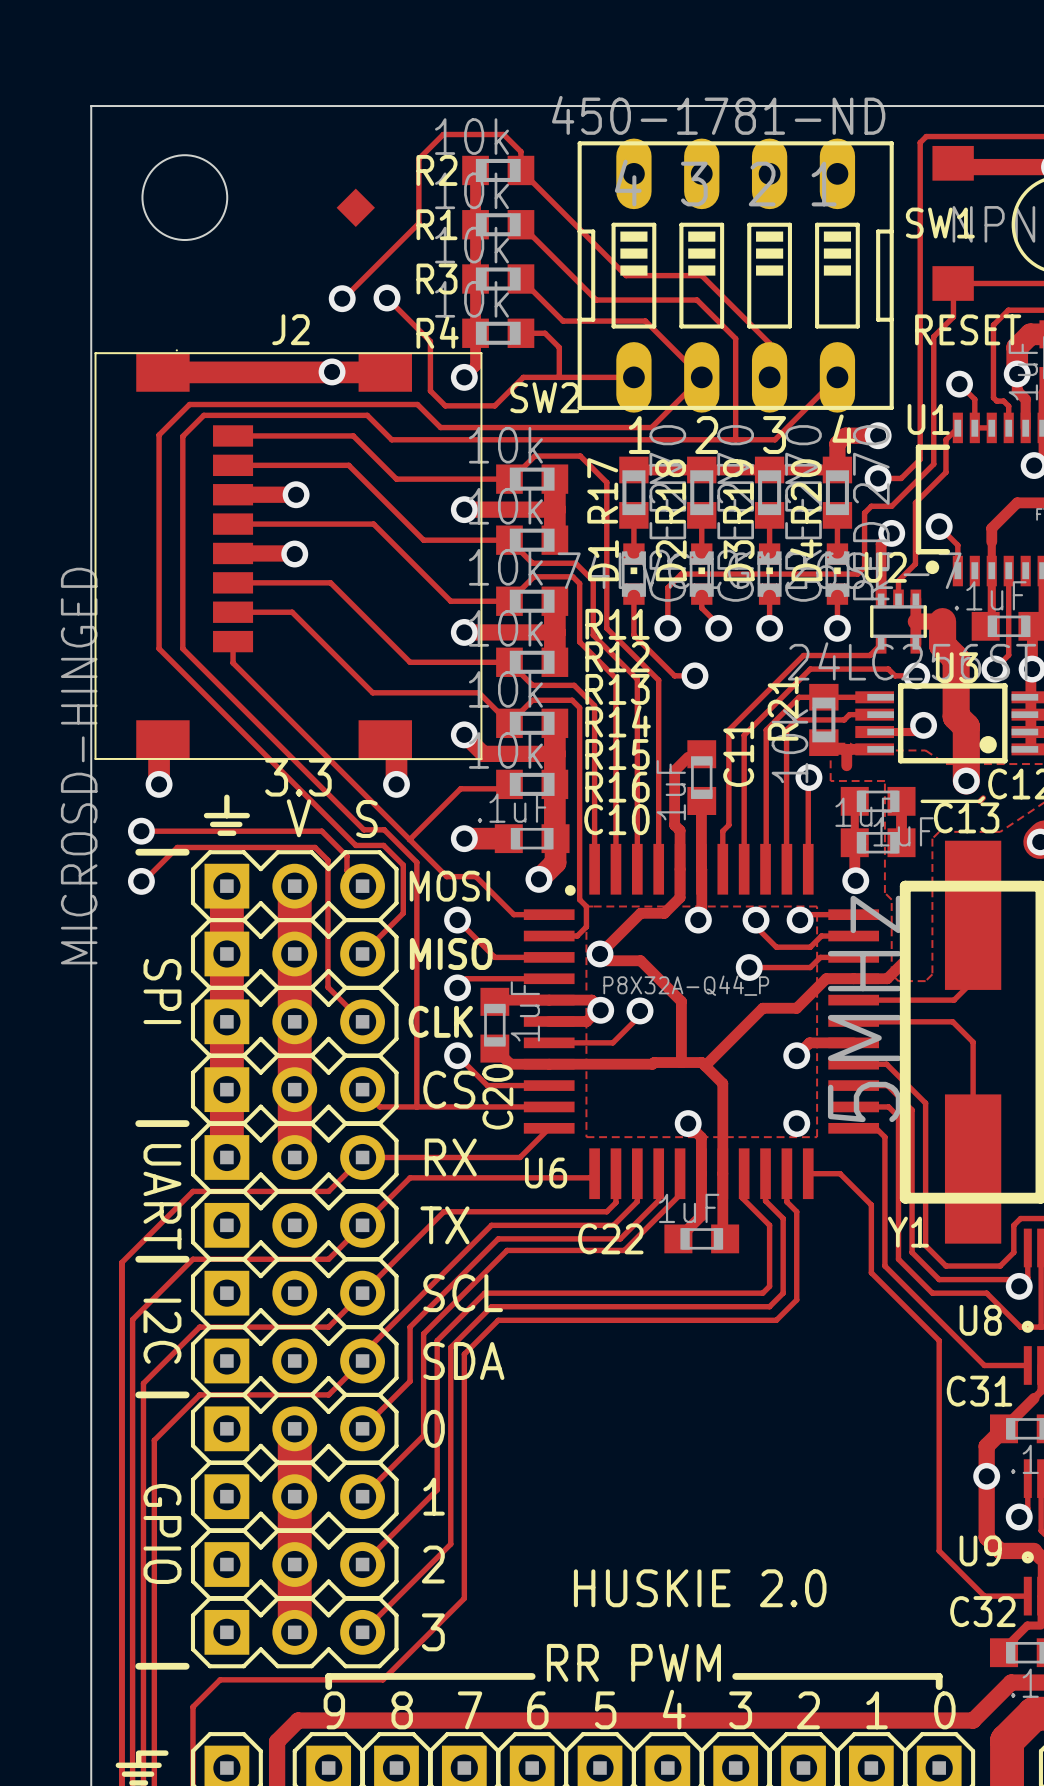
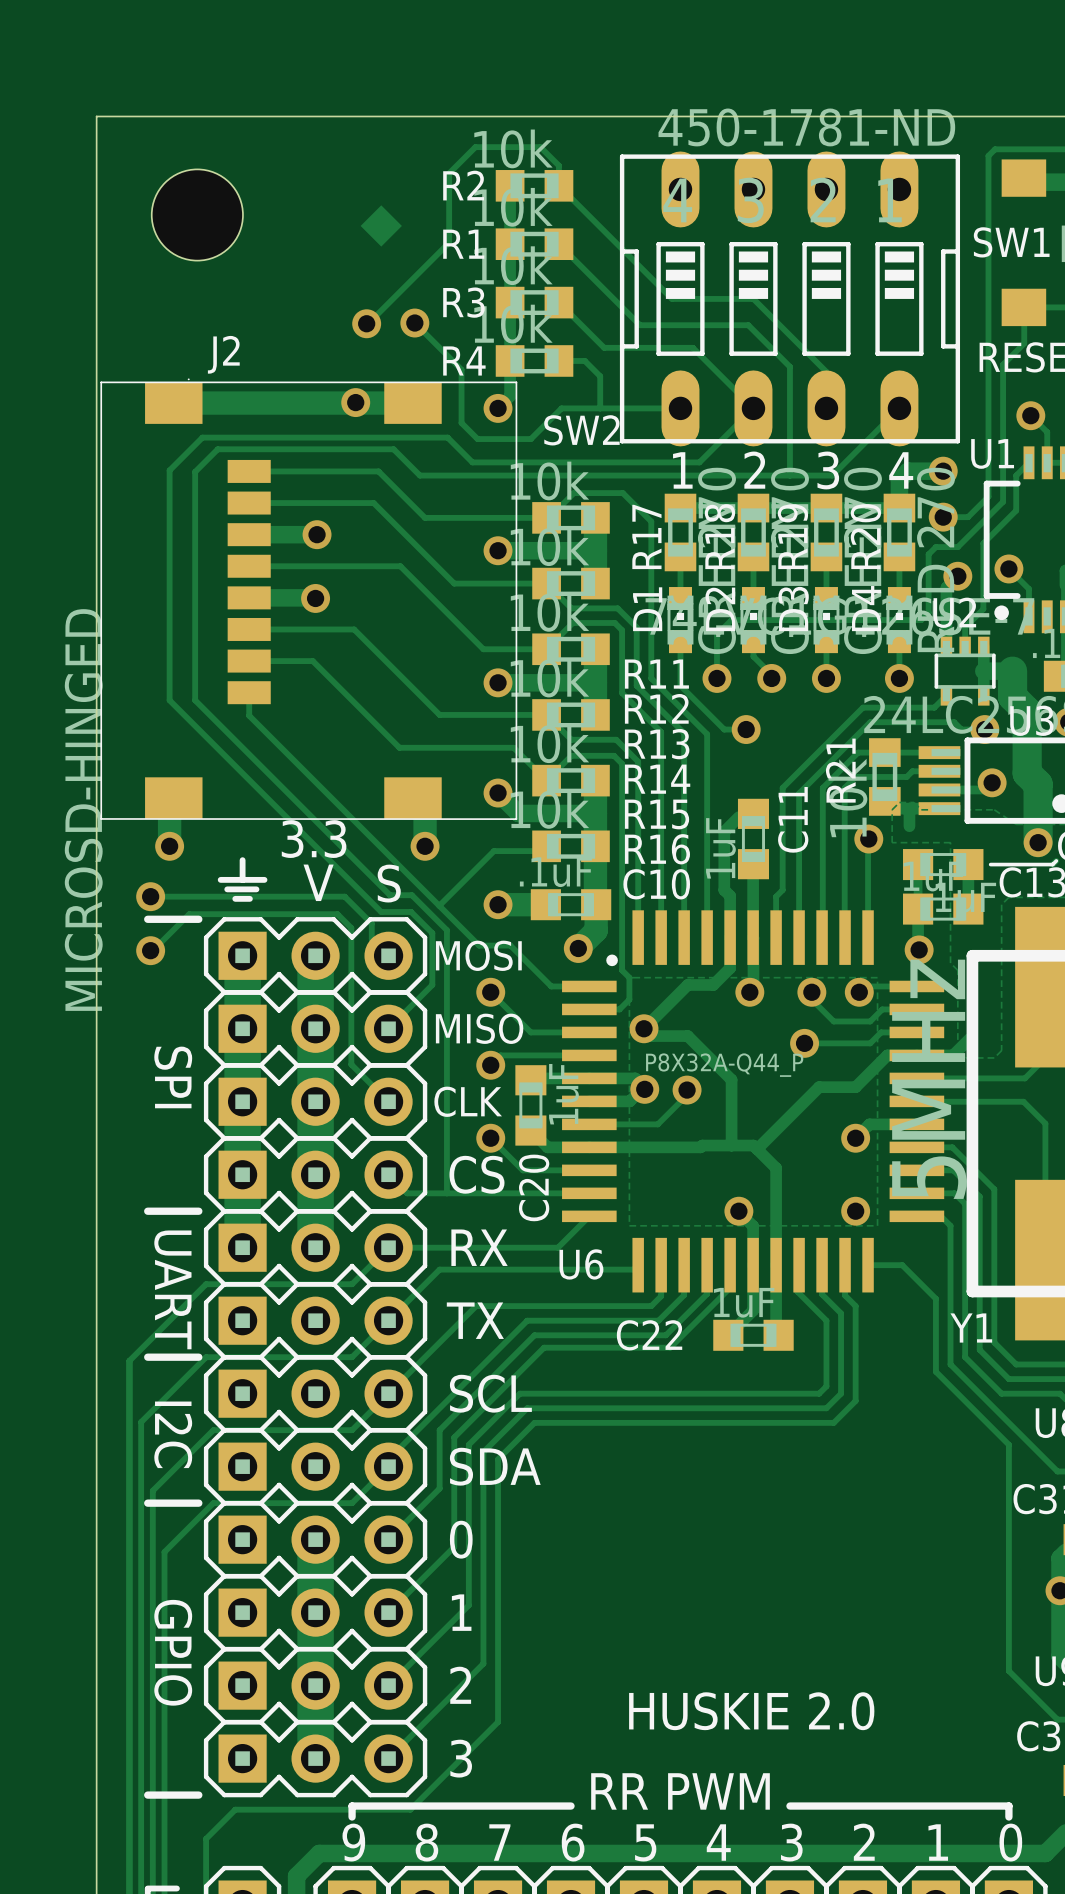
J2 name position: J2 (291, 329) -> J2 (223, 354)

